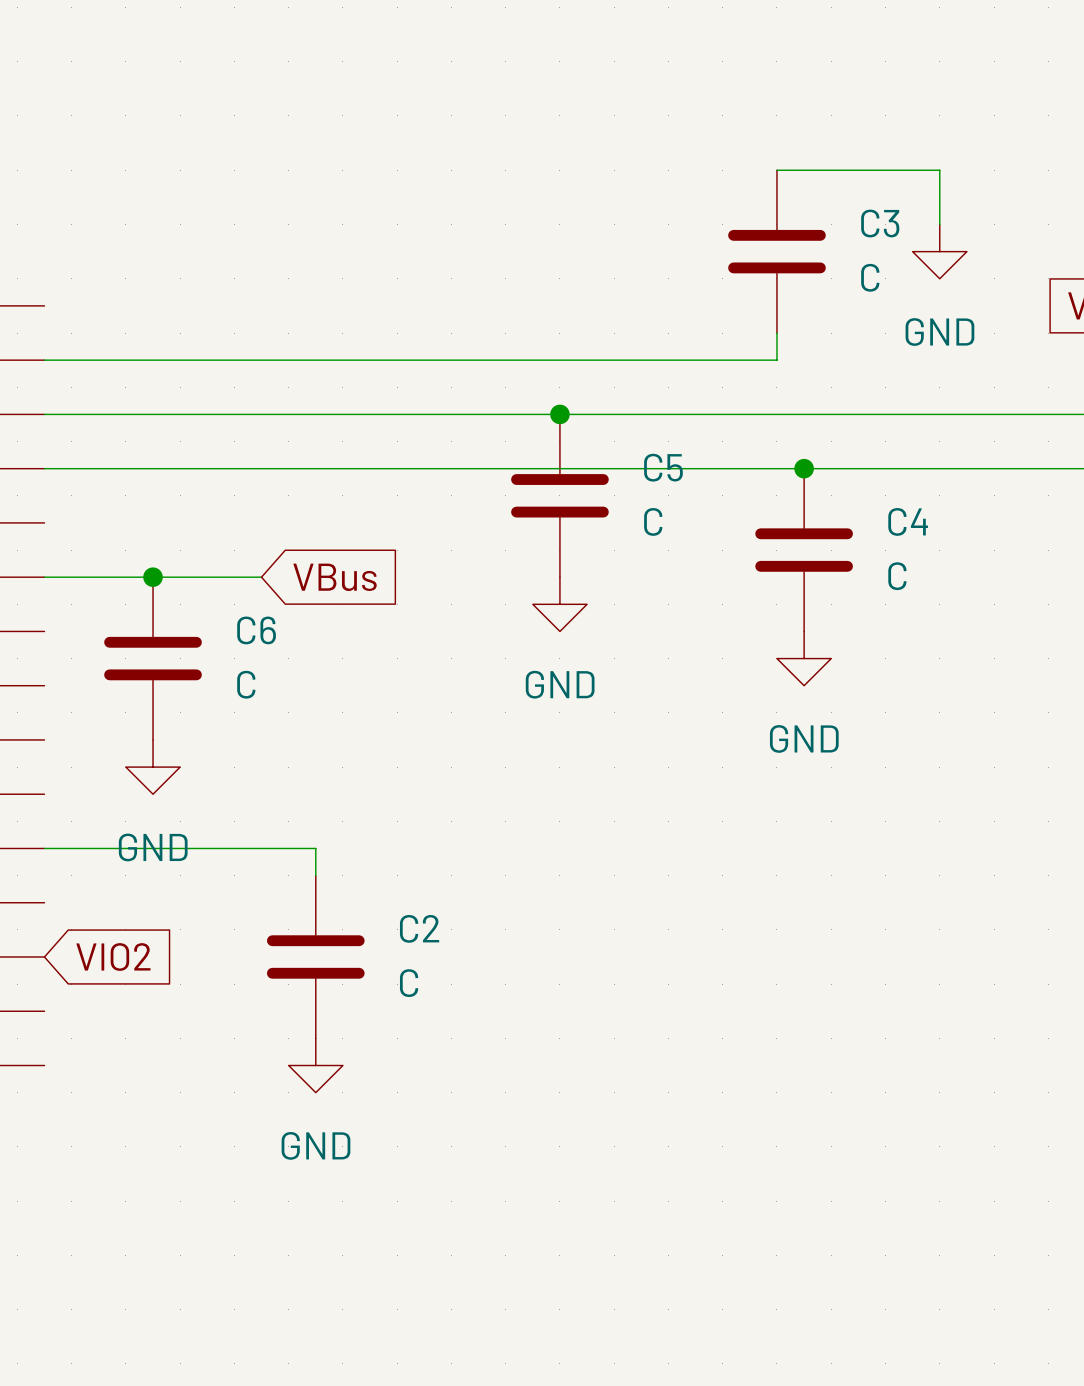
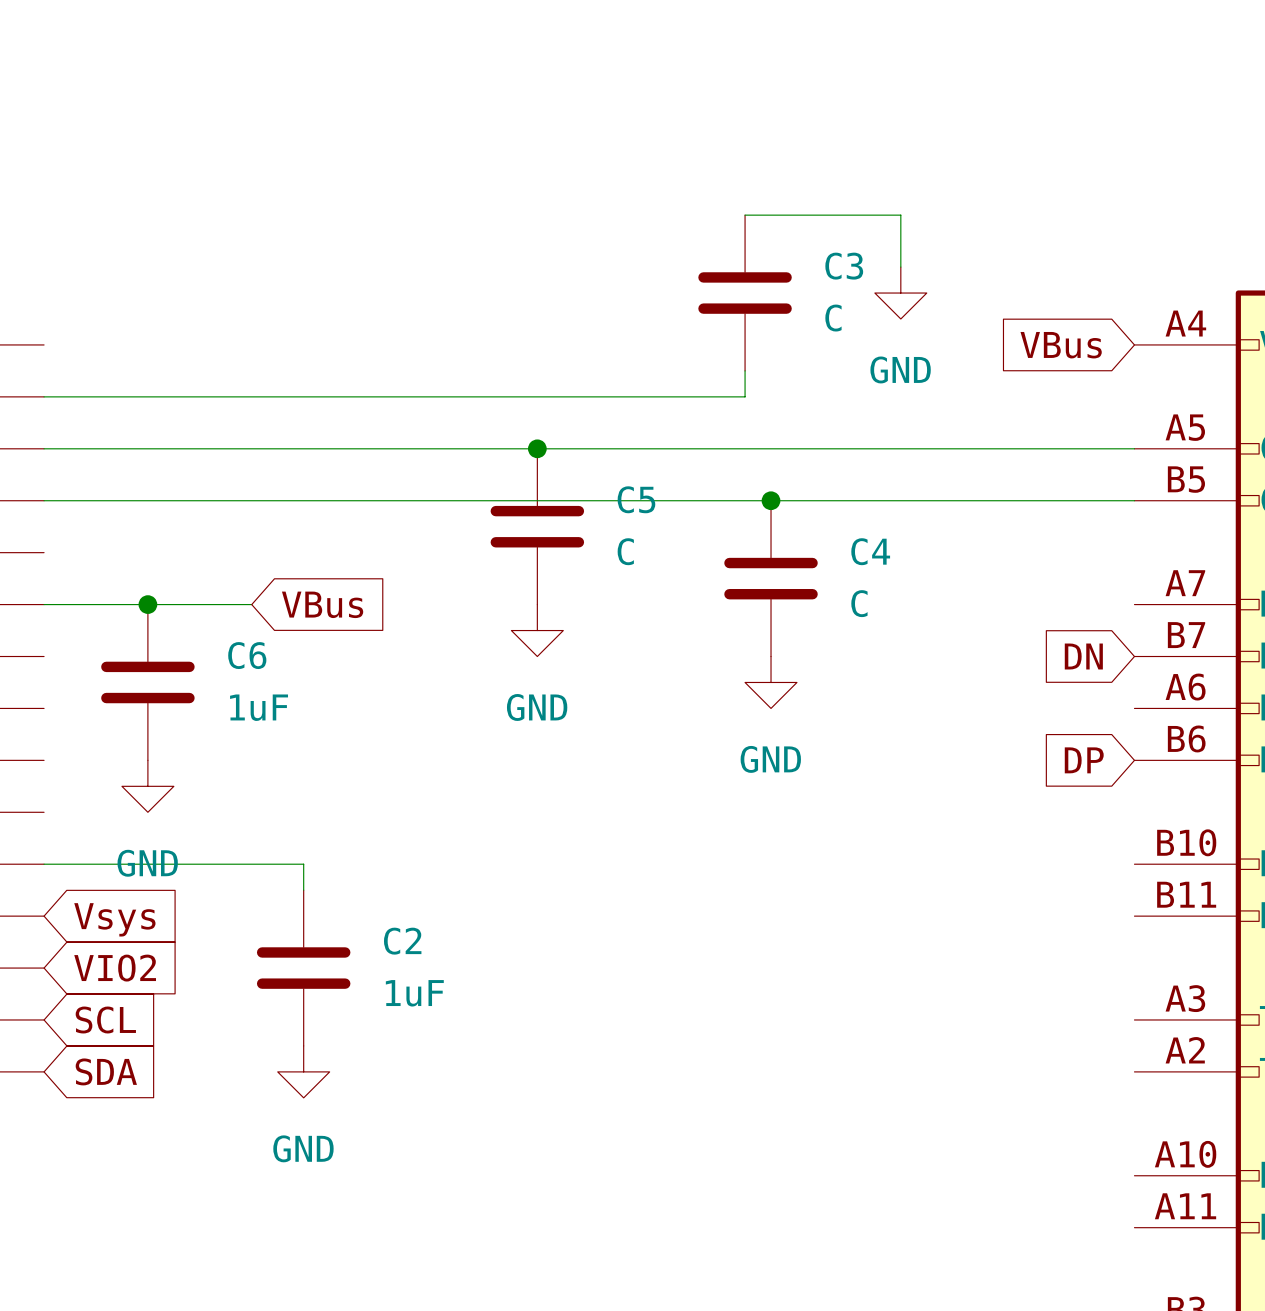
C6 value: C (246, 684) -> 1uF (259, 707)
global label: none -> Vsys (114, 919)
C2 value: C (409, 983) -> 1uF (414, 993)
global label: none -> SCL (105, 1020)
global label: none -> SDA (106, 1071)

